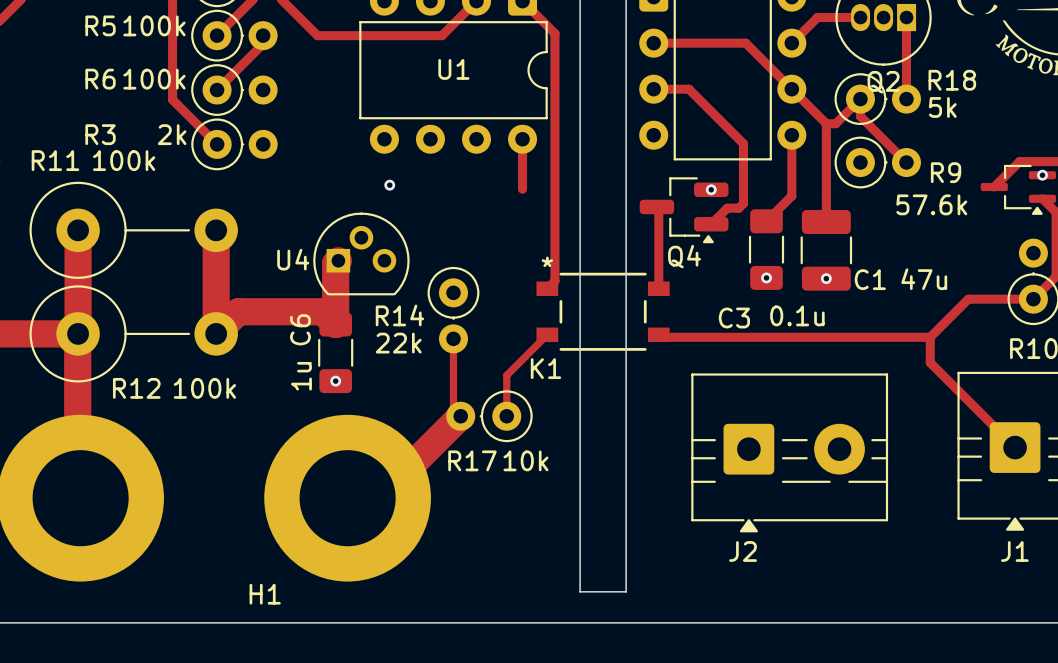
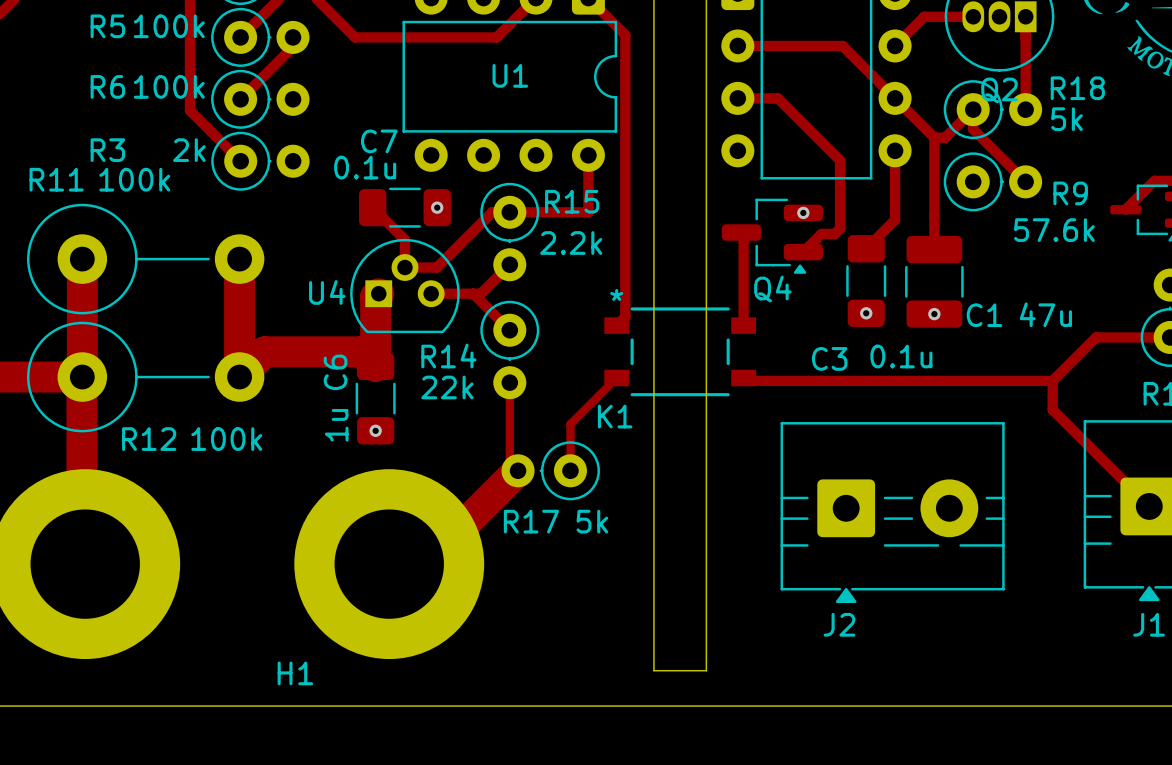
track: none -> (372, 207) (404, 239) (404, 267) (436, 267) (492, 212) (588, 212)
C7: none -> 0.1u (404, 207)
R15: none -> 2.2k (509, 232)
track: none -> (509, 264) (480, 293) (431, 293)
track: none -> (473, 293) (509, 330)
R17 value: 10k (525, 460) -> 5k (592, 521)

